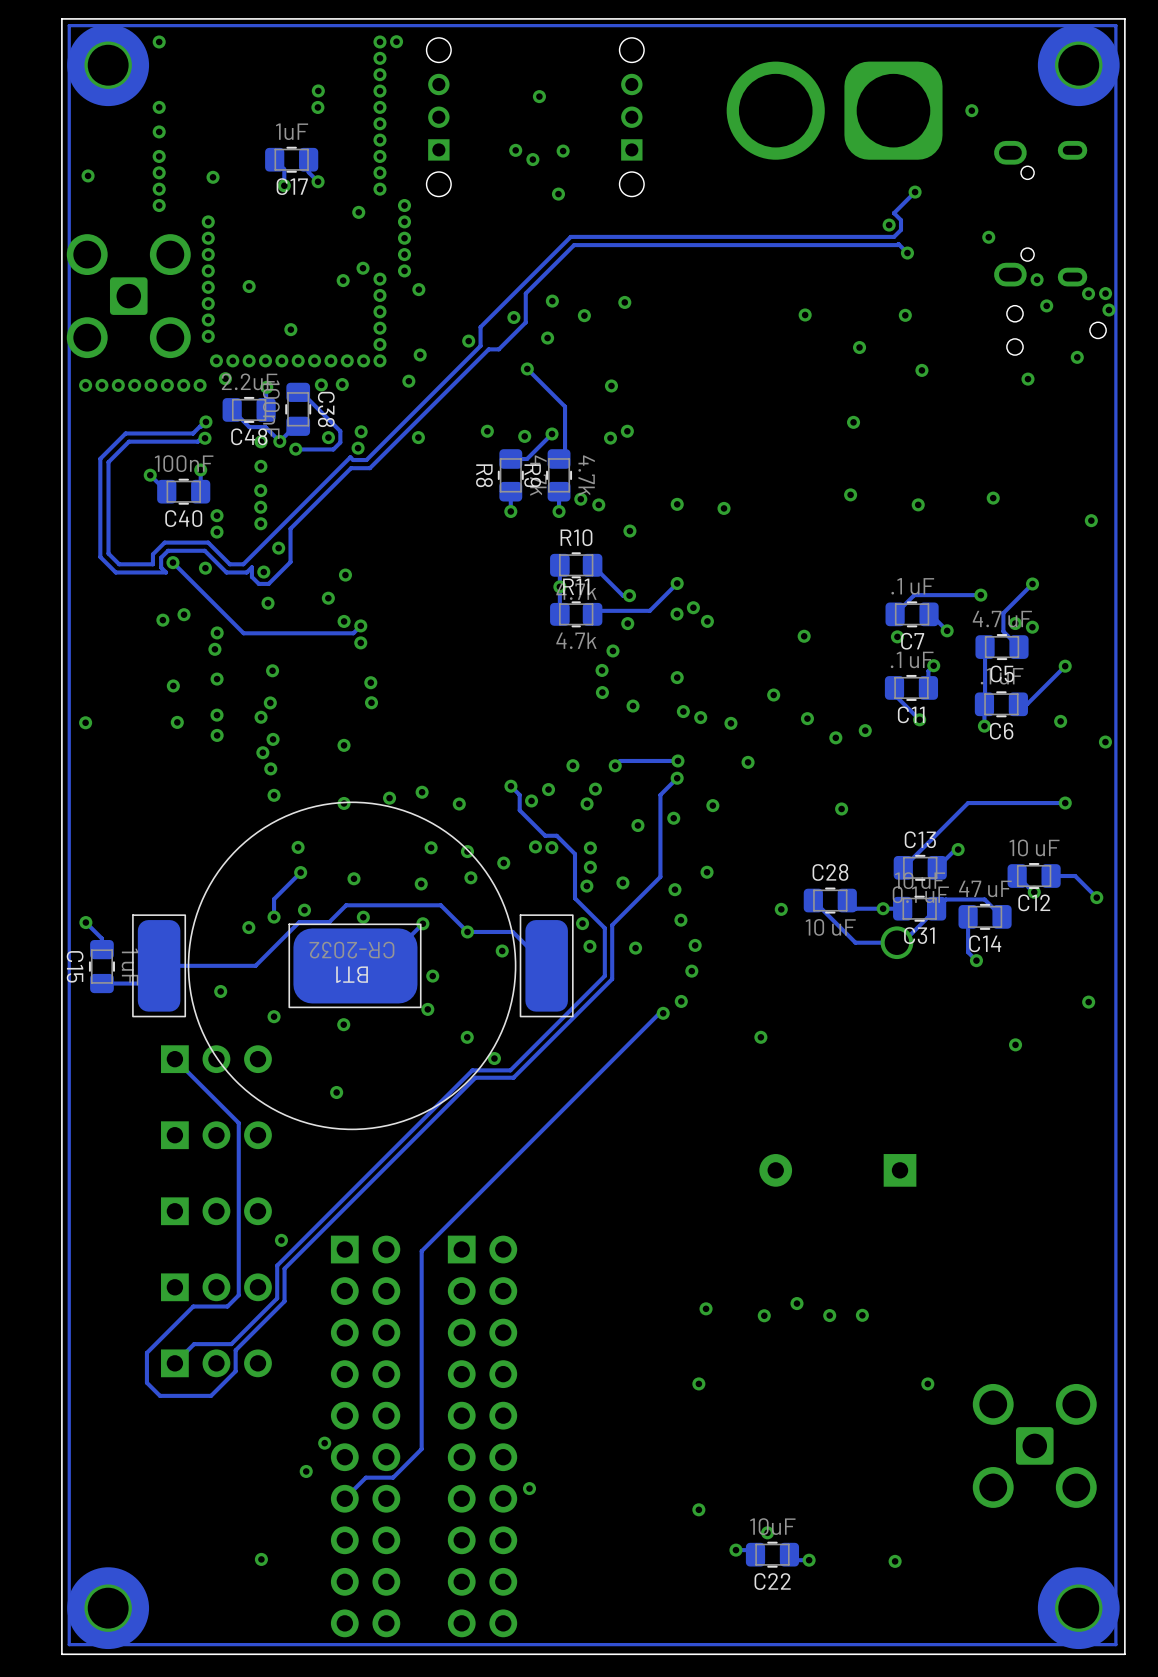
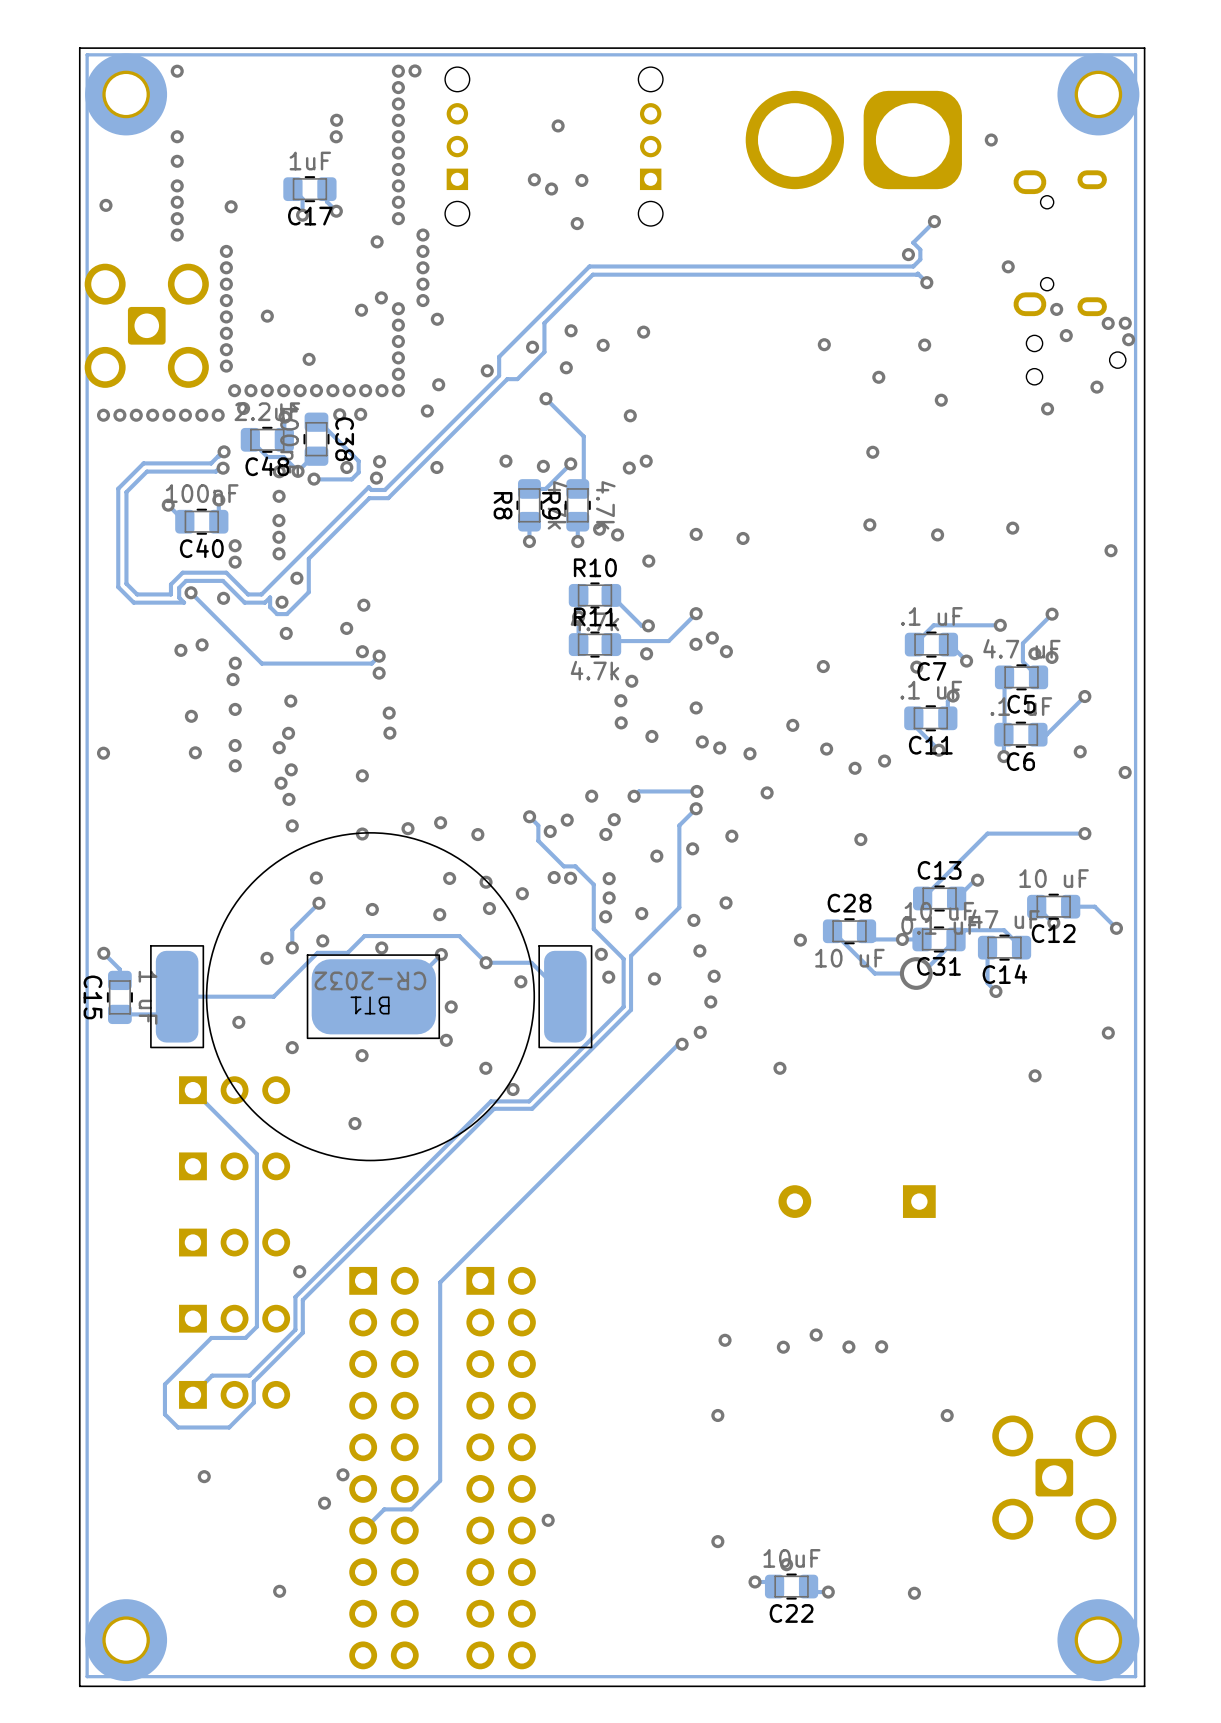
via: none -> (204, 1476)

